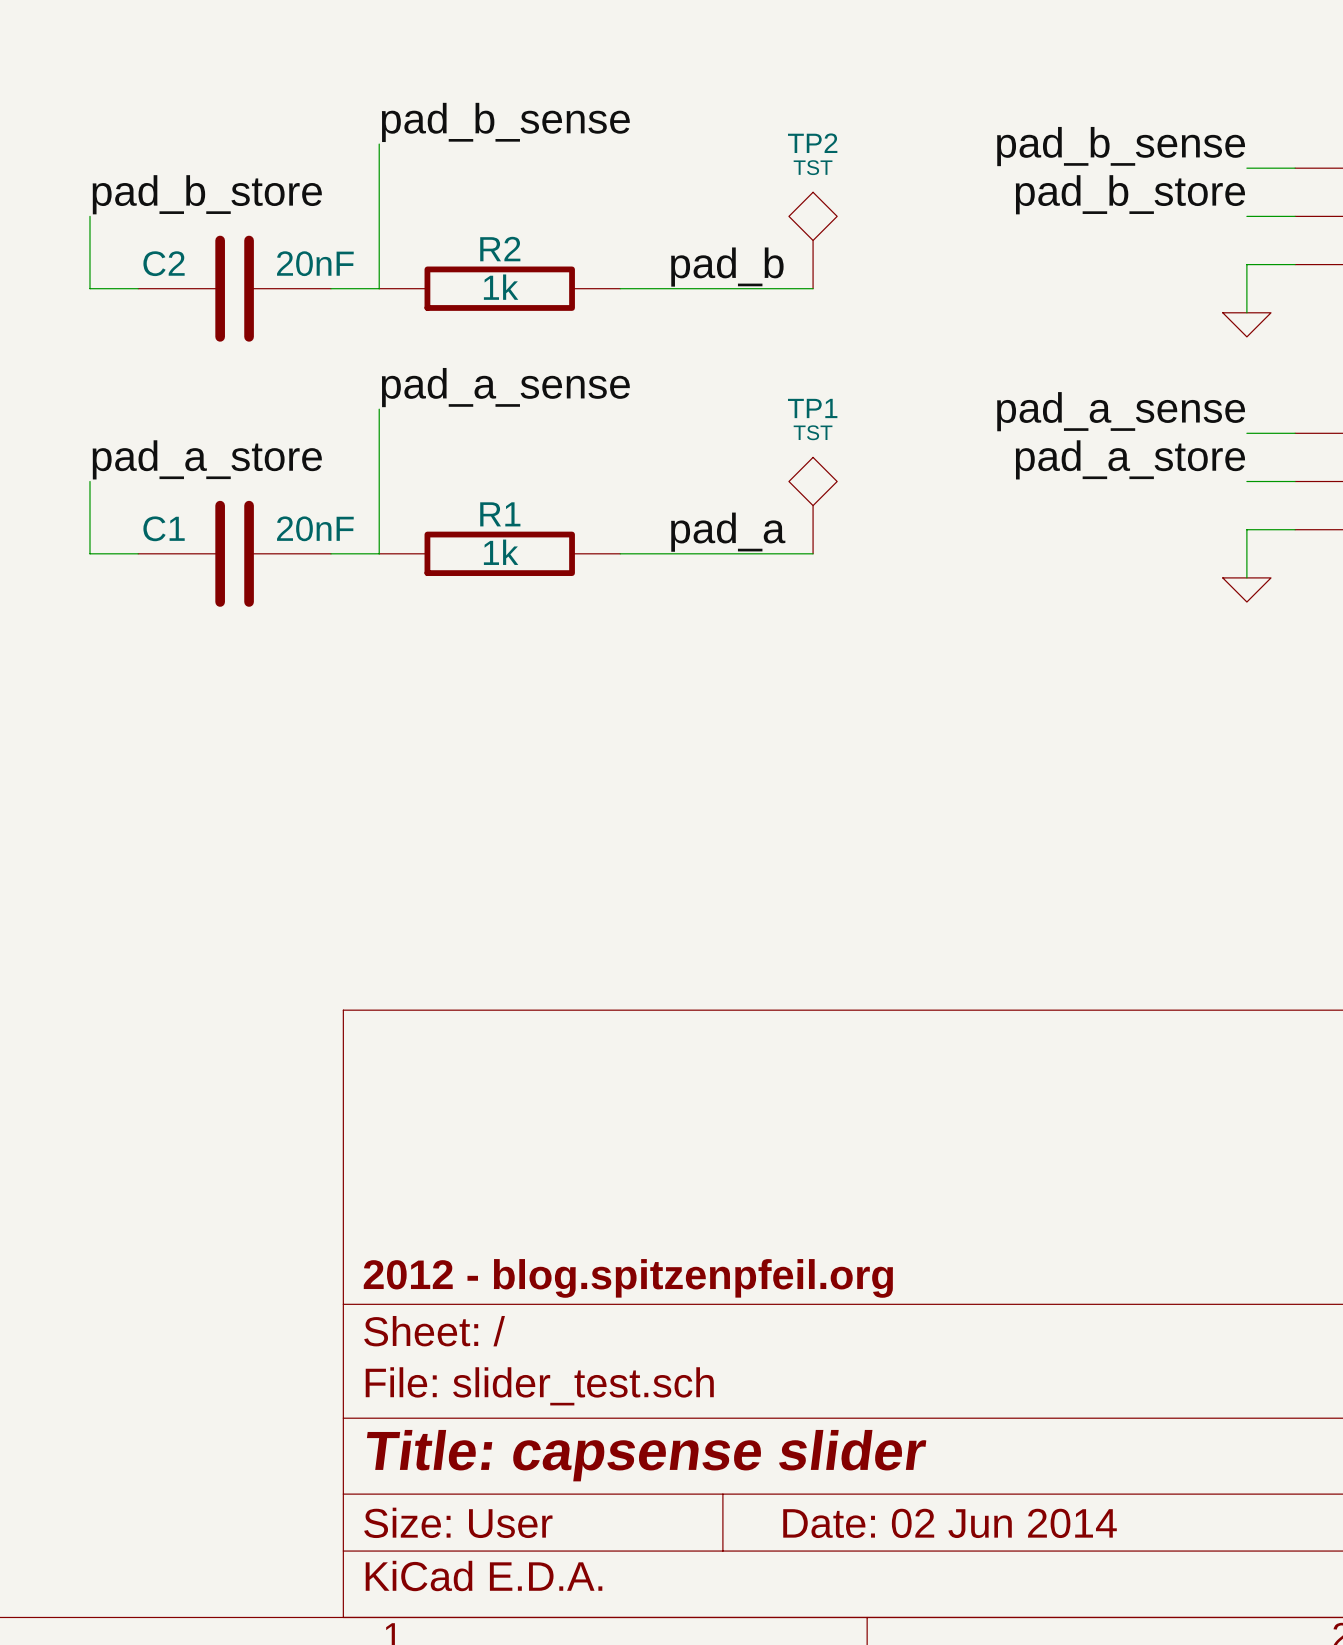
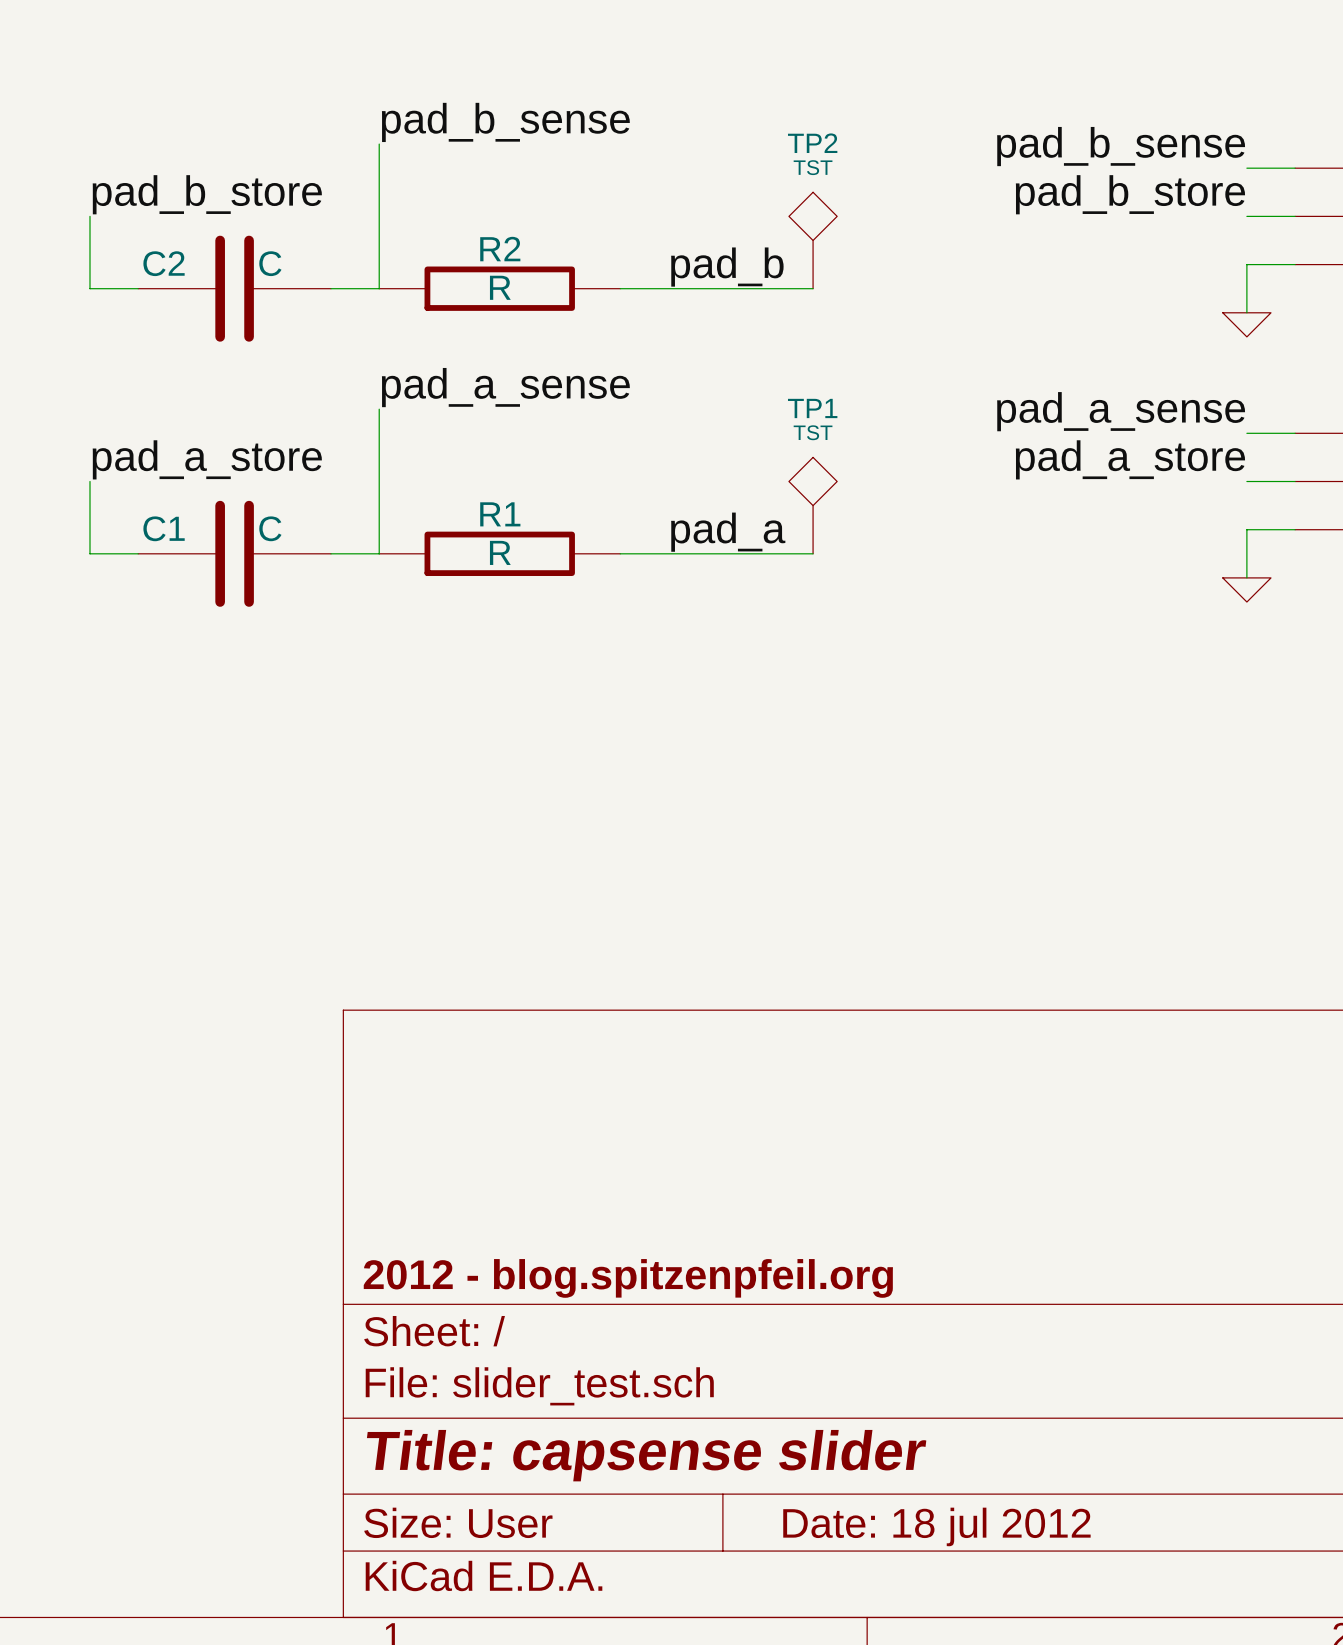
C2 value: 20nF (315, 263) -> C (270, 263)
R2 value: 1k (501, 287) -> R (500, 287)
C1 value: 20nF (315, 528) -> C (270, 528)
R1 value: 1k (501, 552) -> R (500, 552)
title block: Date: 02 Jun 2014 (950, 1523) -> Date: 18 jul 2012 (936, 1526)

